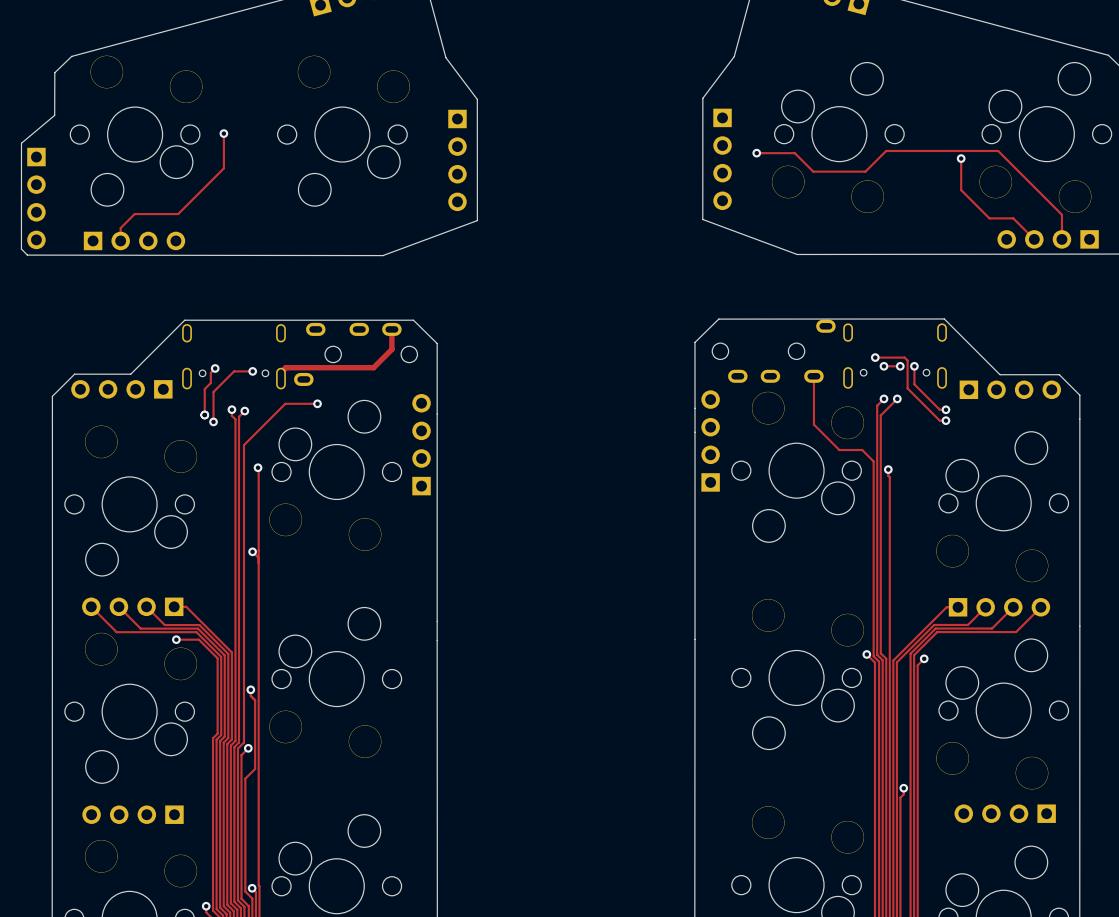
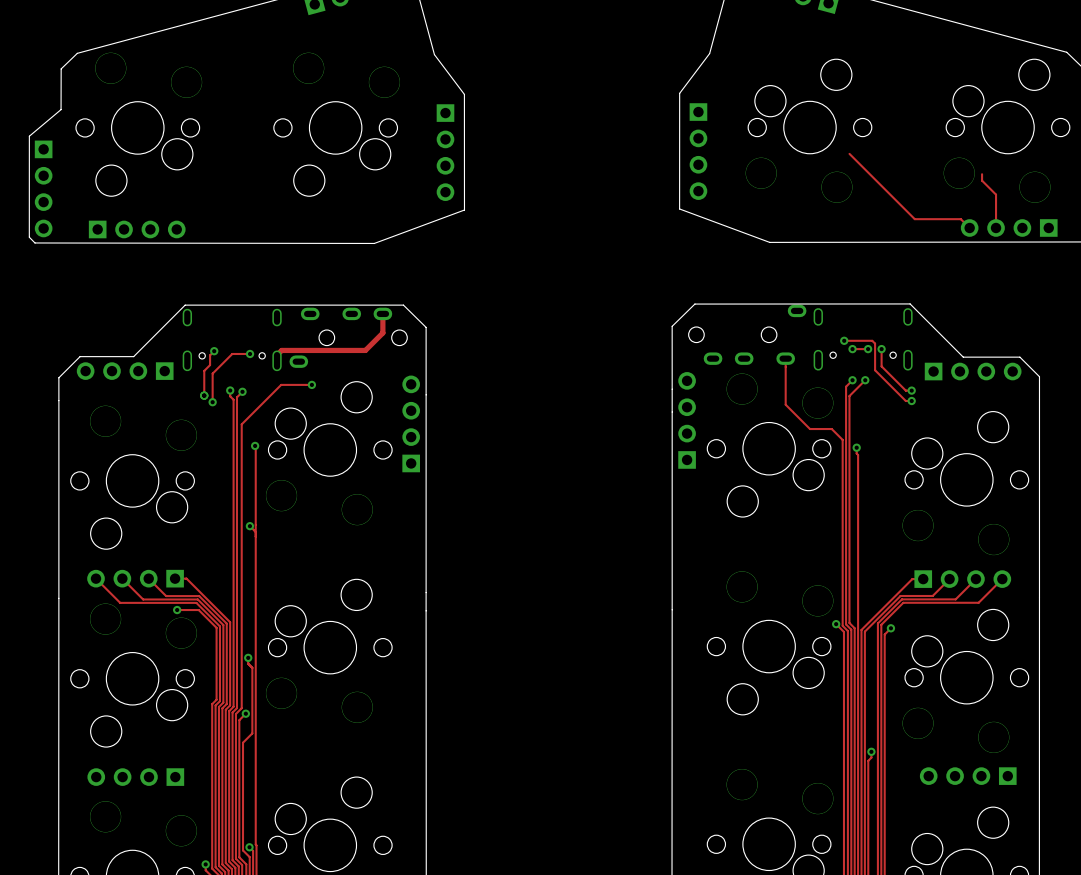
track: (223, 133) (223, 168) (178, 214) (134, 214) (120, 228) (120, 240) -> none
via: (223, 133) -> none
track: (756, 153) (794, 153) (813, 171) (865, 171) (886, 150) (998, 150) (1061, 214) (1061, 239) -> none
via: (756, 153) -> none
track: (961, 158) (961, 190) (989, 218) (1013, 218) (1034, 239) -> (982, 174) (982, 180) (996, 194) (996, 227)
via: (961, 158) -> none
track: none -> (849, 153) (914, 219) (960, 219) (969, 227)

